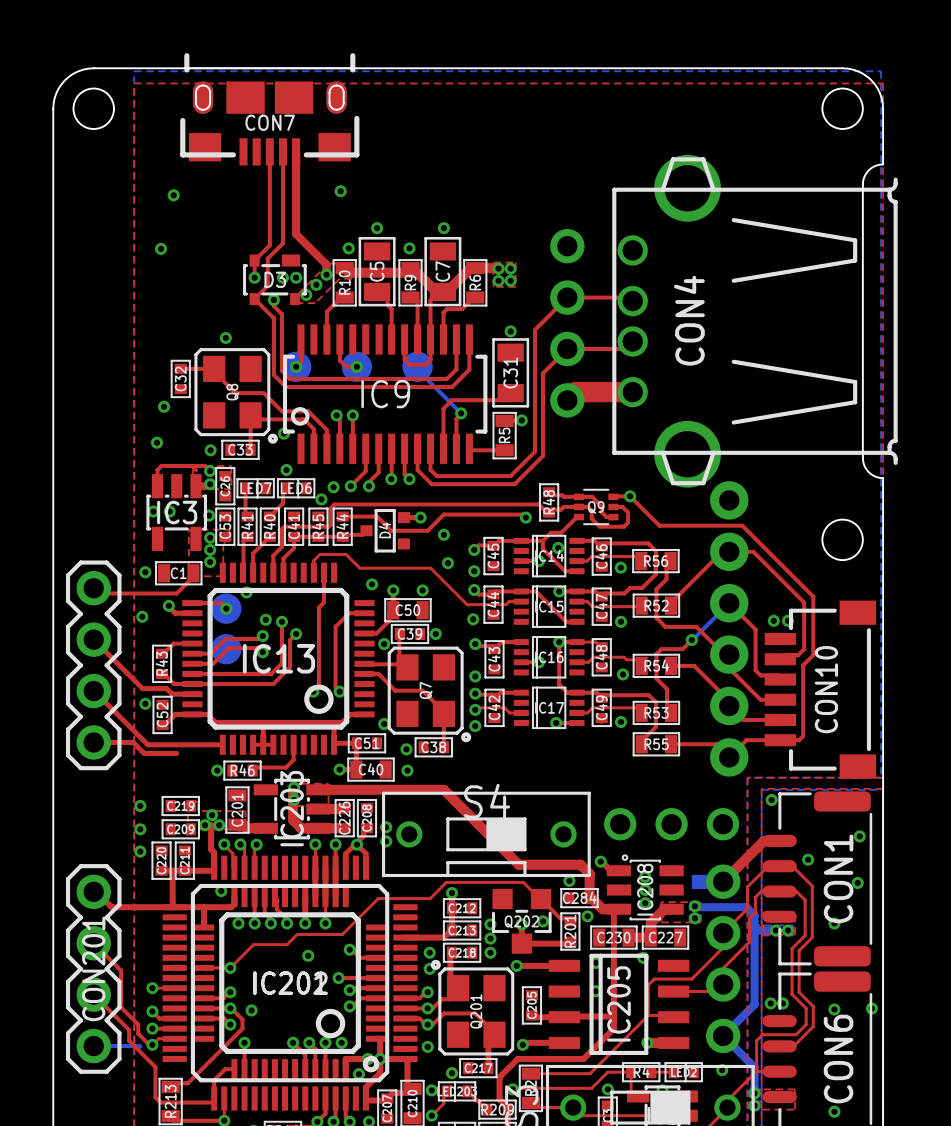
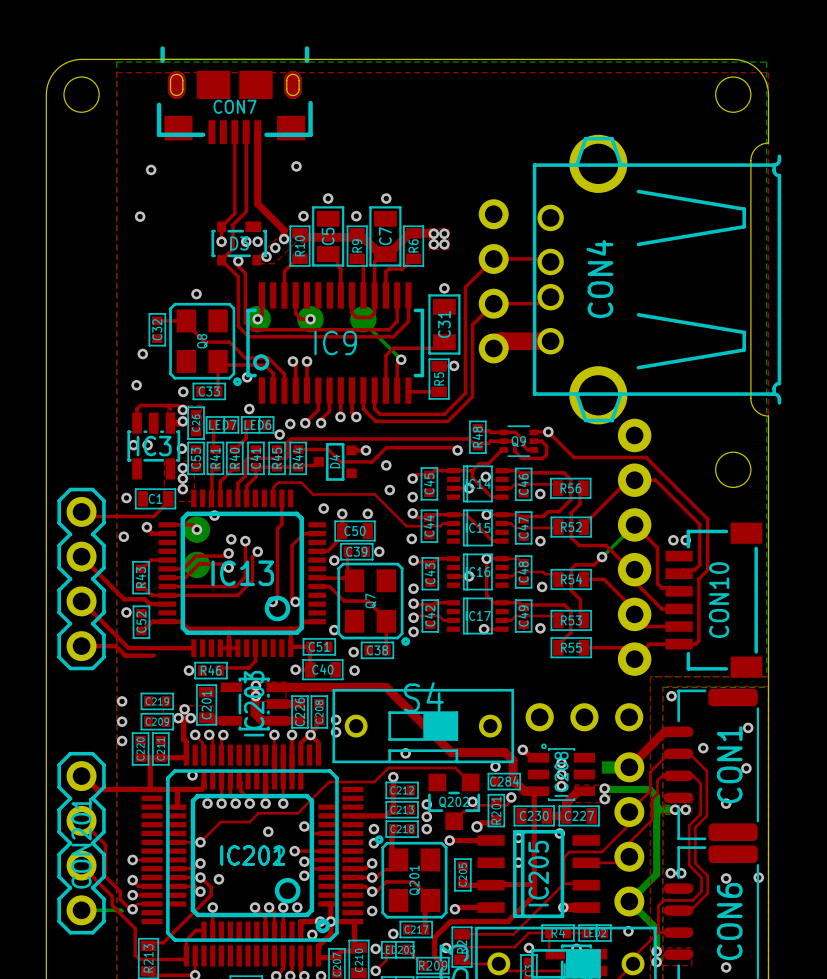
top track: (541, 899) (560, 918) (570, 918) (570, 921) -> none
top track: none -> (513, 798) (506, 805) (478, 805) (472, 811) (464, 811) (454, 821)
top track: (521, 924) (521, 943) (568, 943) (570, 941) -> none
via position: (521, 924) -> (405, 753)
top track: none -> (498, 822) (480, 822) (476, 826)
via: none -> (476, 826)

